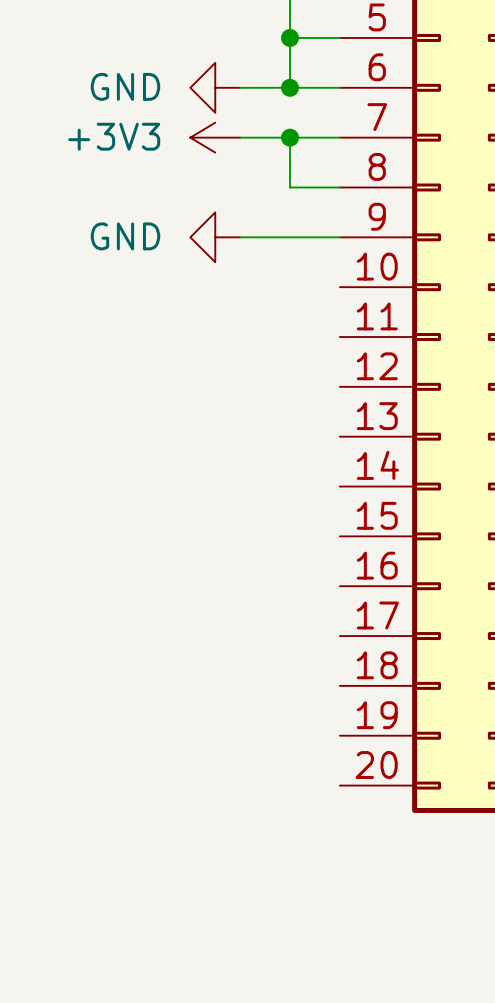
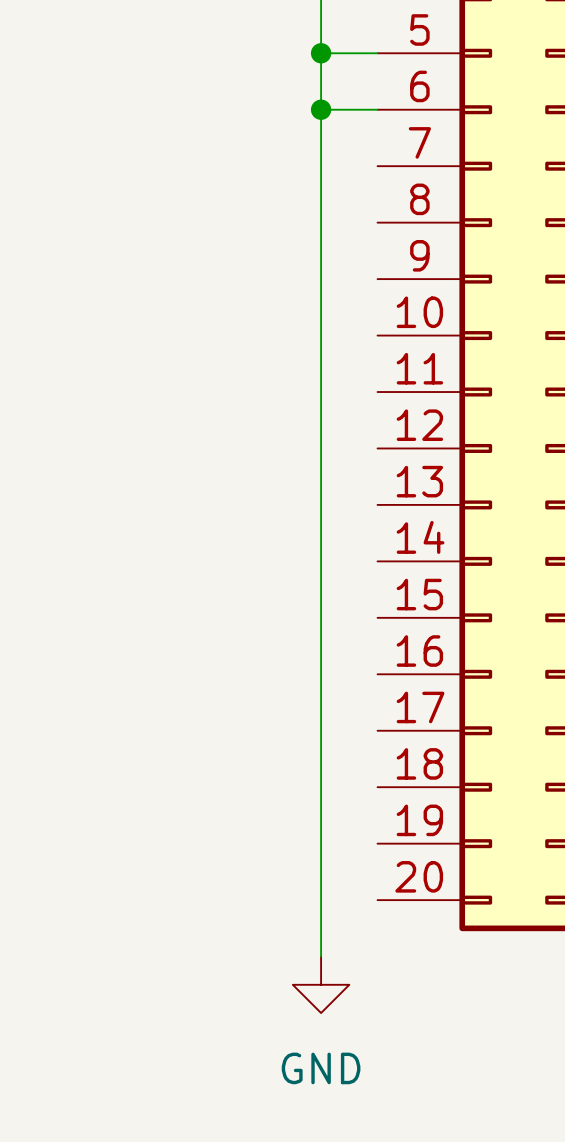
power symbol: GND (215, 87) -> none
wire: (240, 87) (290, 87) -> (321, 166) (321, 109)
power symbol: +3V3 (215, 137) -> none
wire: (240, 137) (339, 137) -> none
junction: (290, 137) -> none
wire: (290, 187) (339, 187) -> (321, 222) (321, 956)
power symbol: GND (215, 237) -> none
wire: (240, 237) (339, 237) -> none
power symbol: none -> GND (321, 984)

